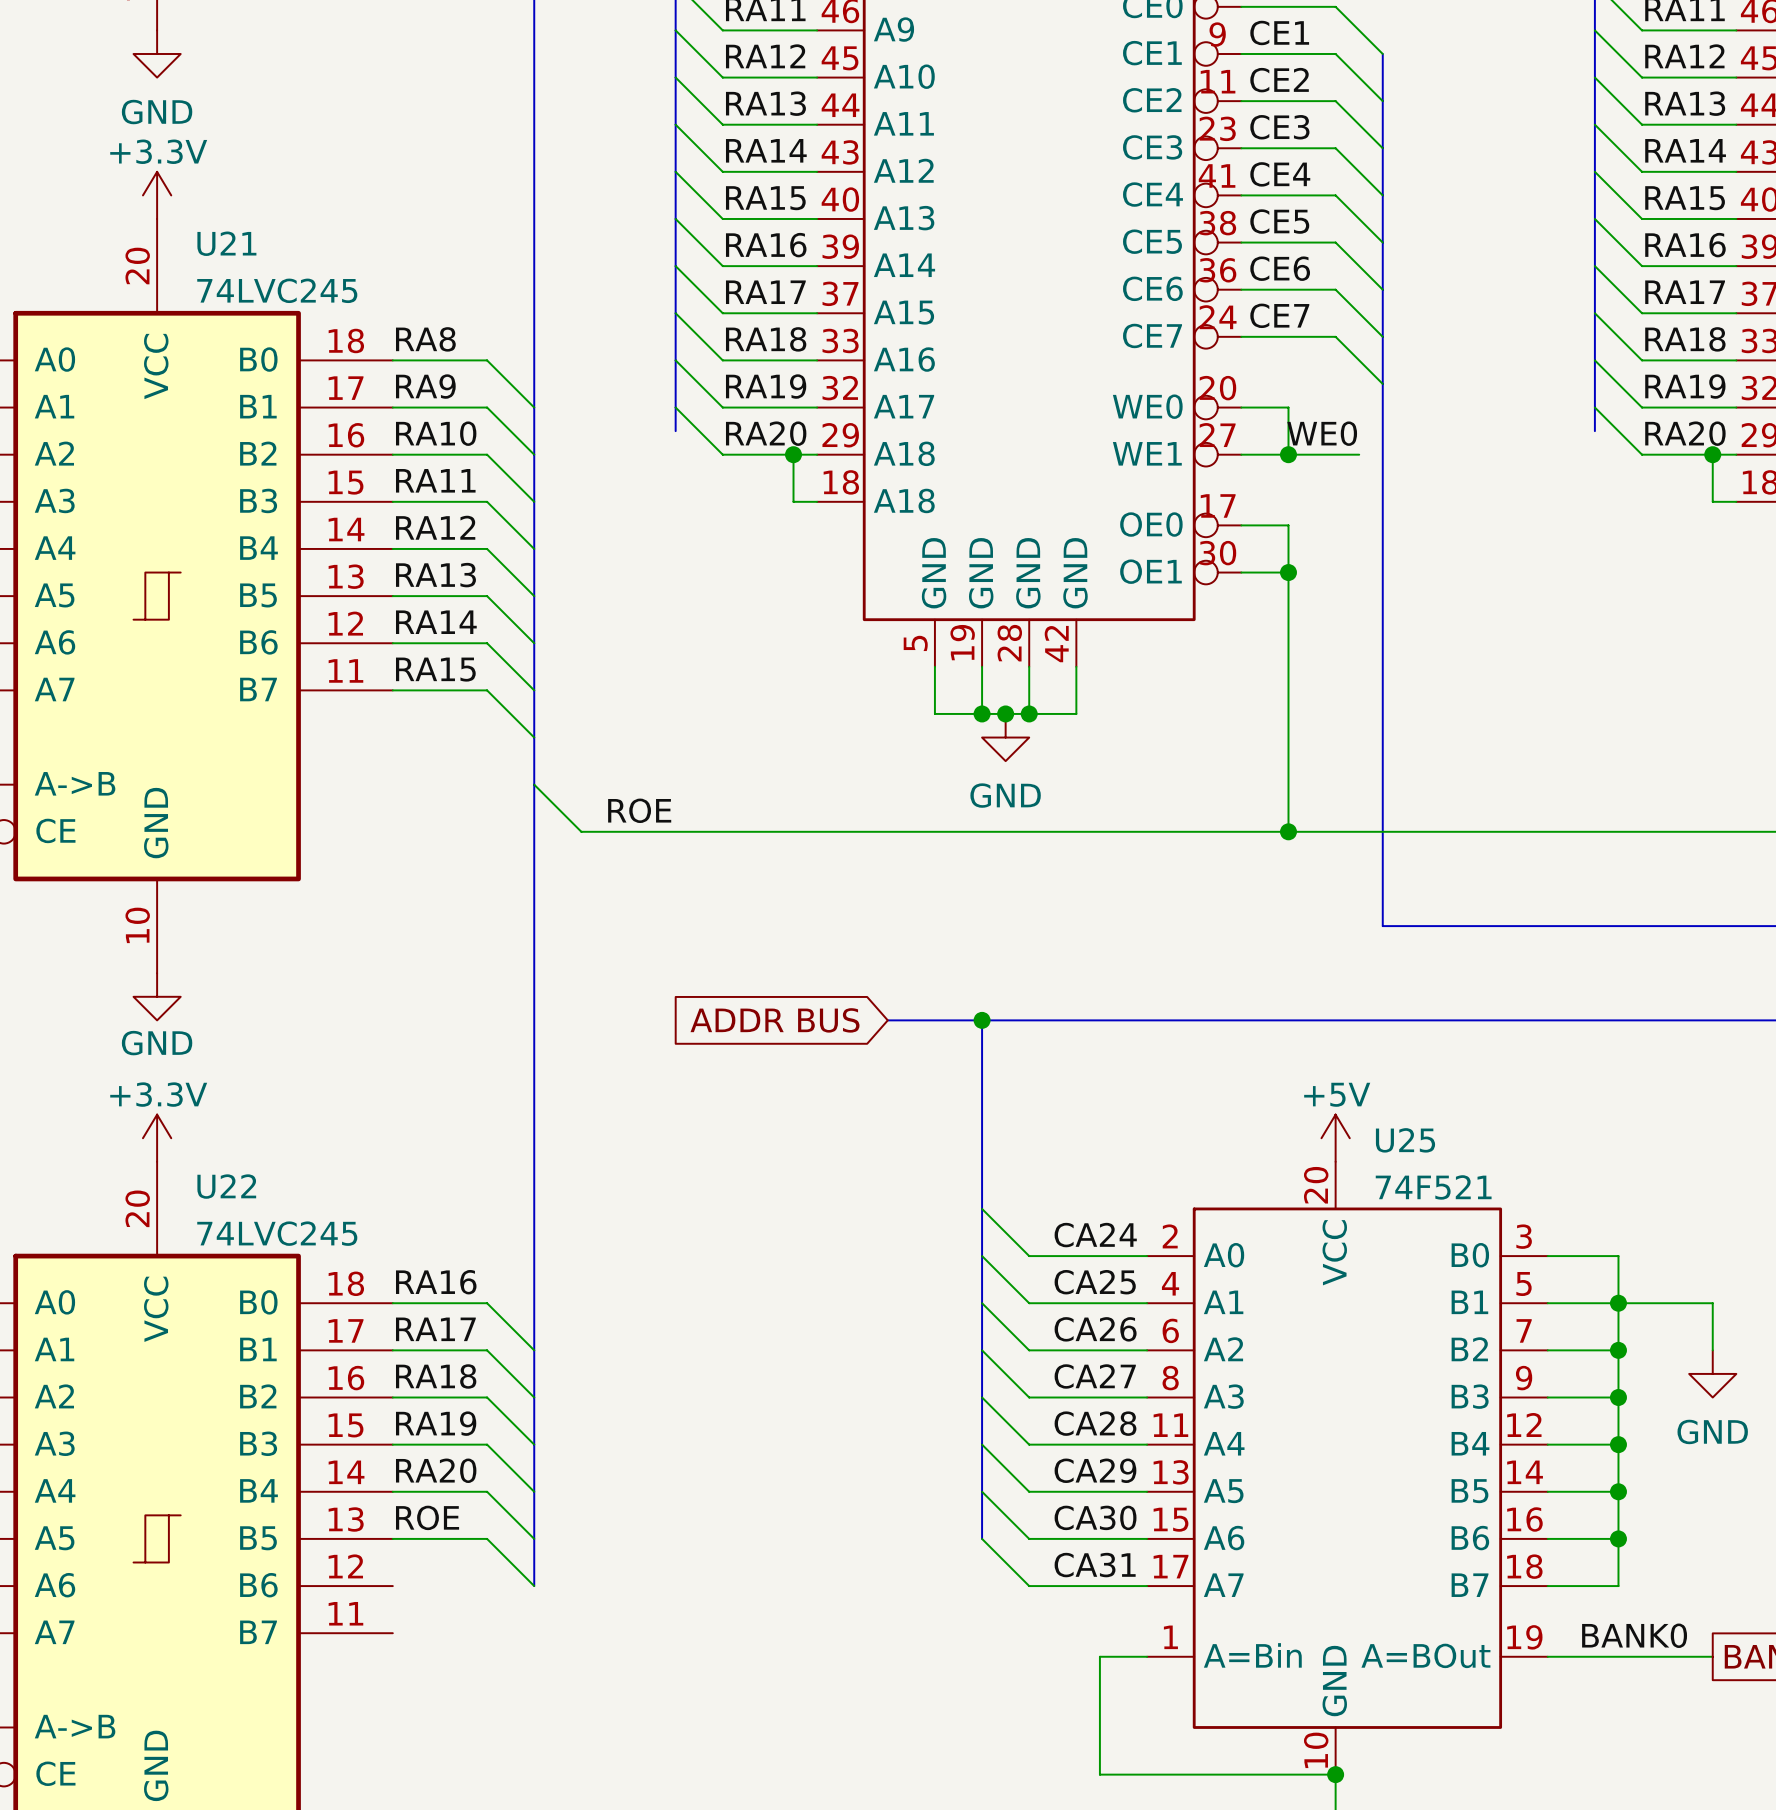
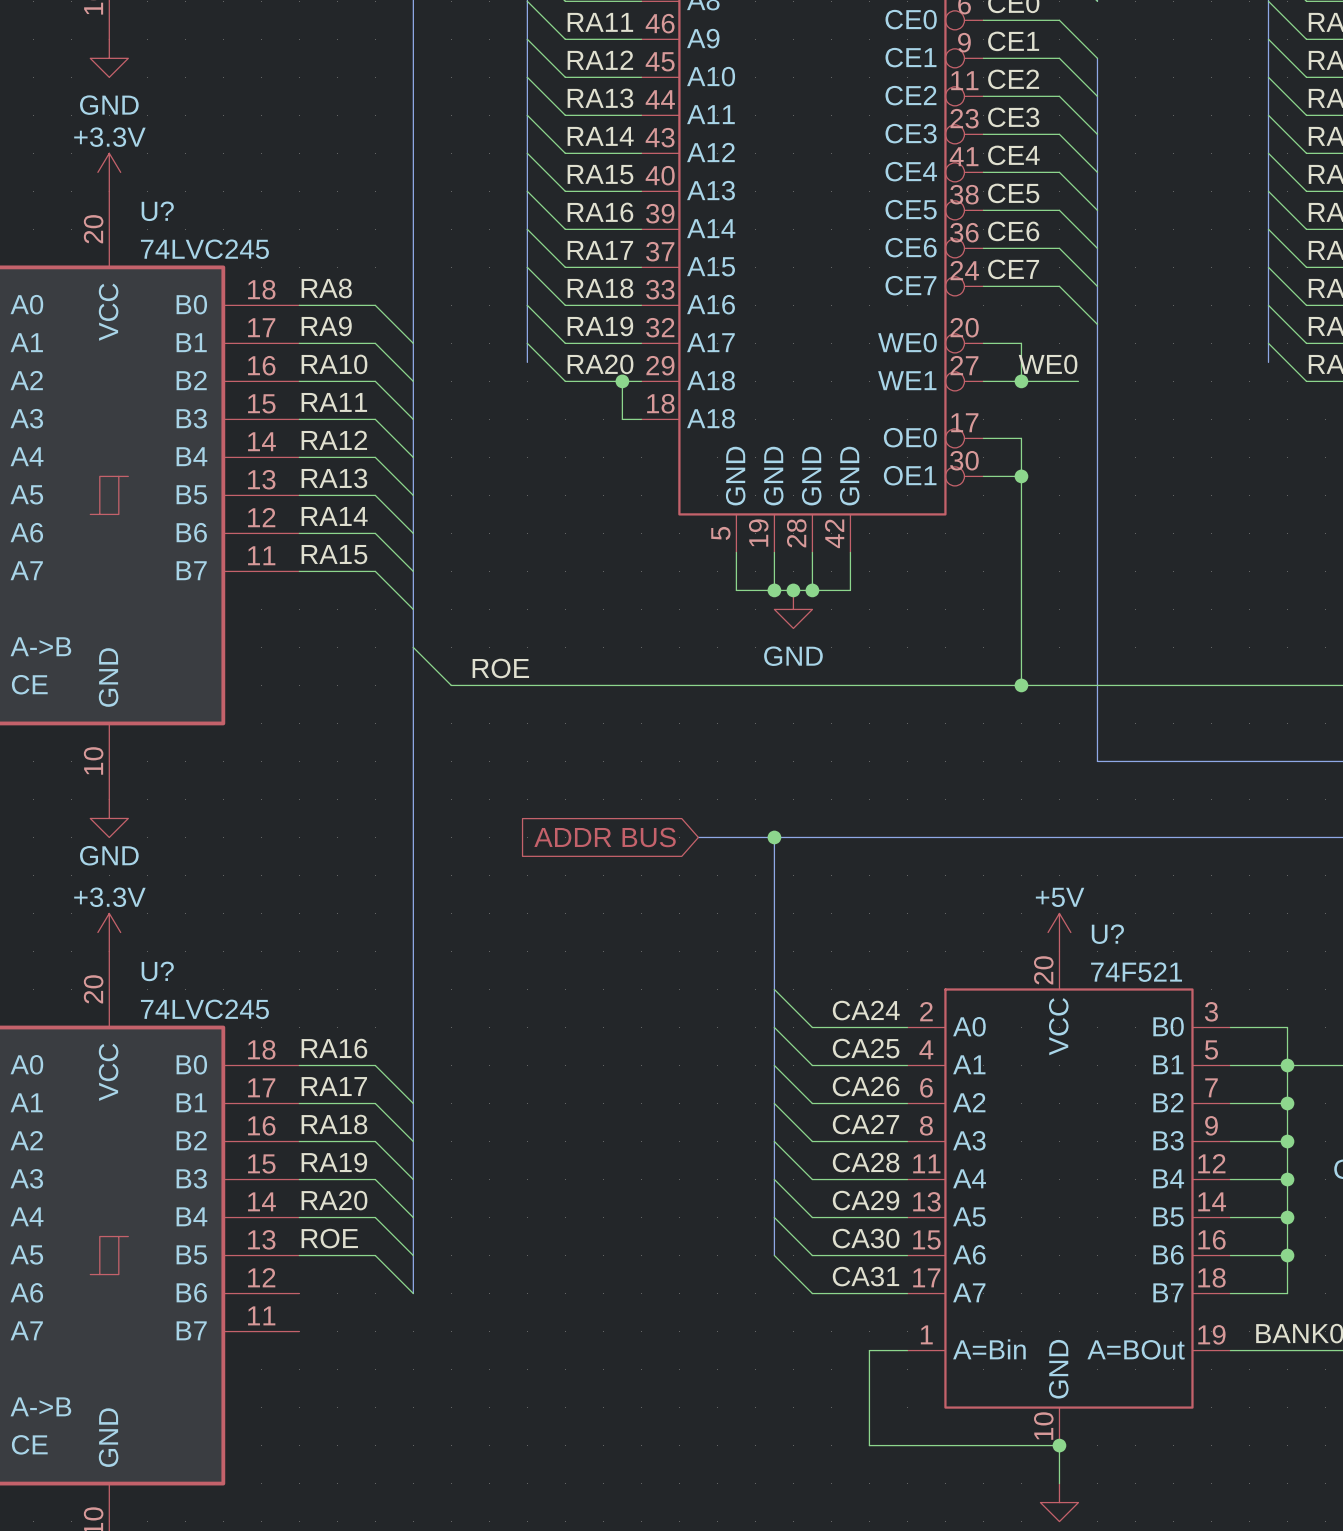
U21 name: U21 (226, 243) -> U? (157, 211)
U25 name: U25 (1405, 1140) -> U? (1107, 934)
U22 name: U22 (226, 1186) -> U? (157, 971)

